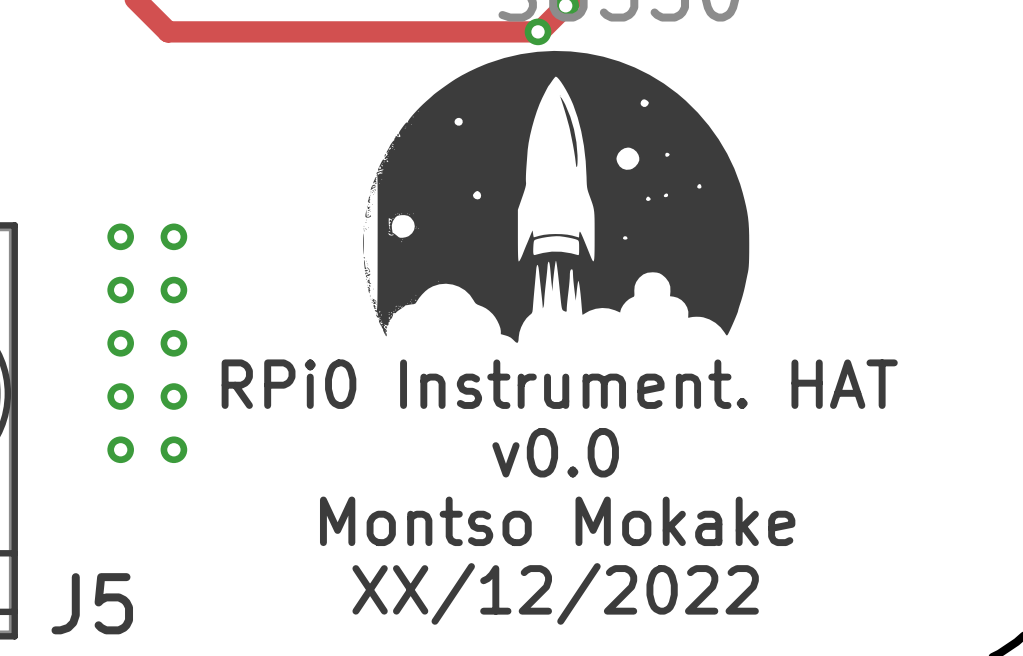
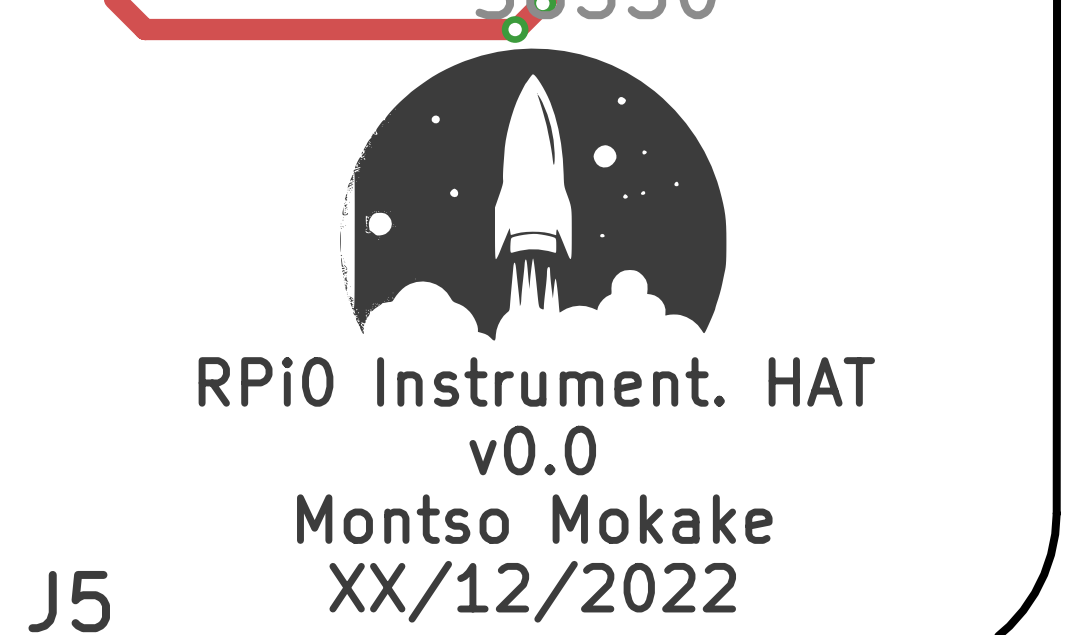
via: (120, 236) -> none
via: (173, 236) -> none
via: (120, 290) -> none
via: (173, 290) -> none
via: (120, 343) -> none
via: (173, 343) -> none
via: (120, 396) -> none
via: (173, 396) -> none
via: (120, 449) -> none
via: (173, 449) -> none

